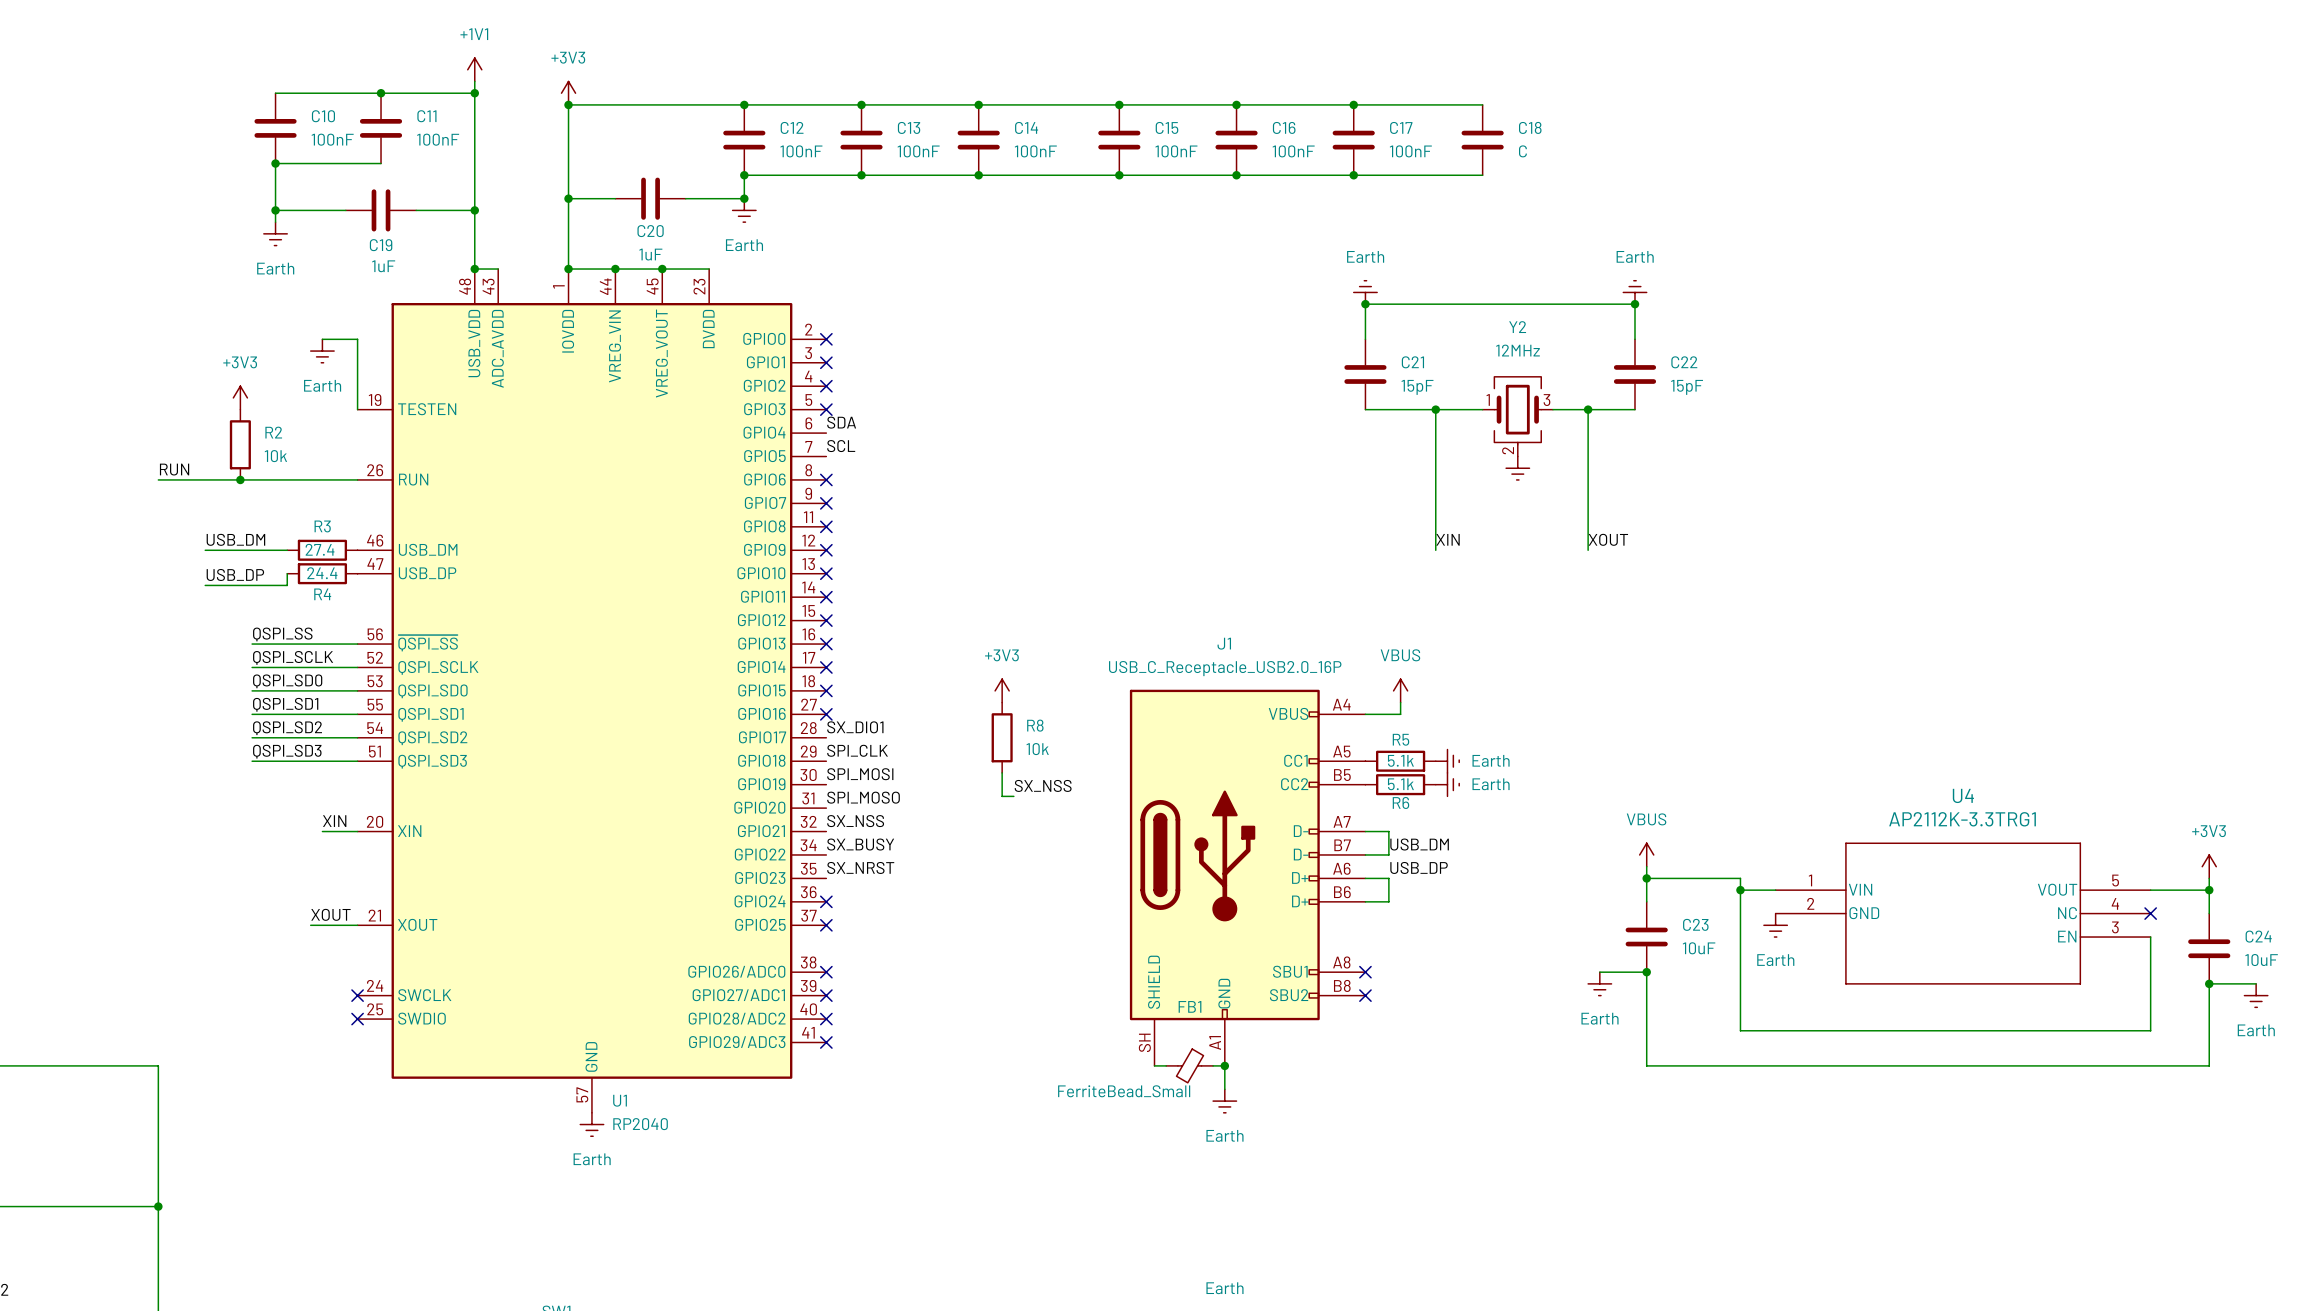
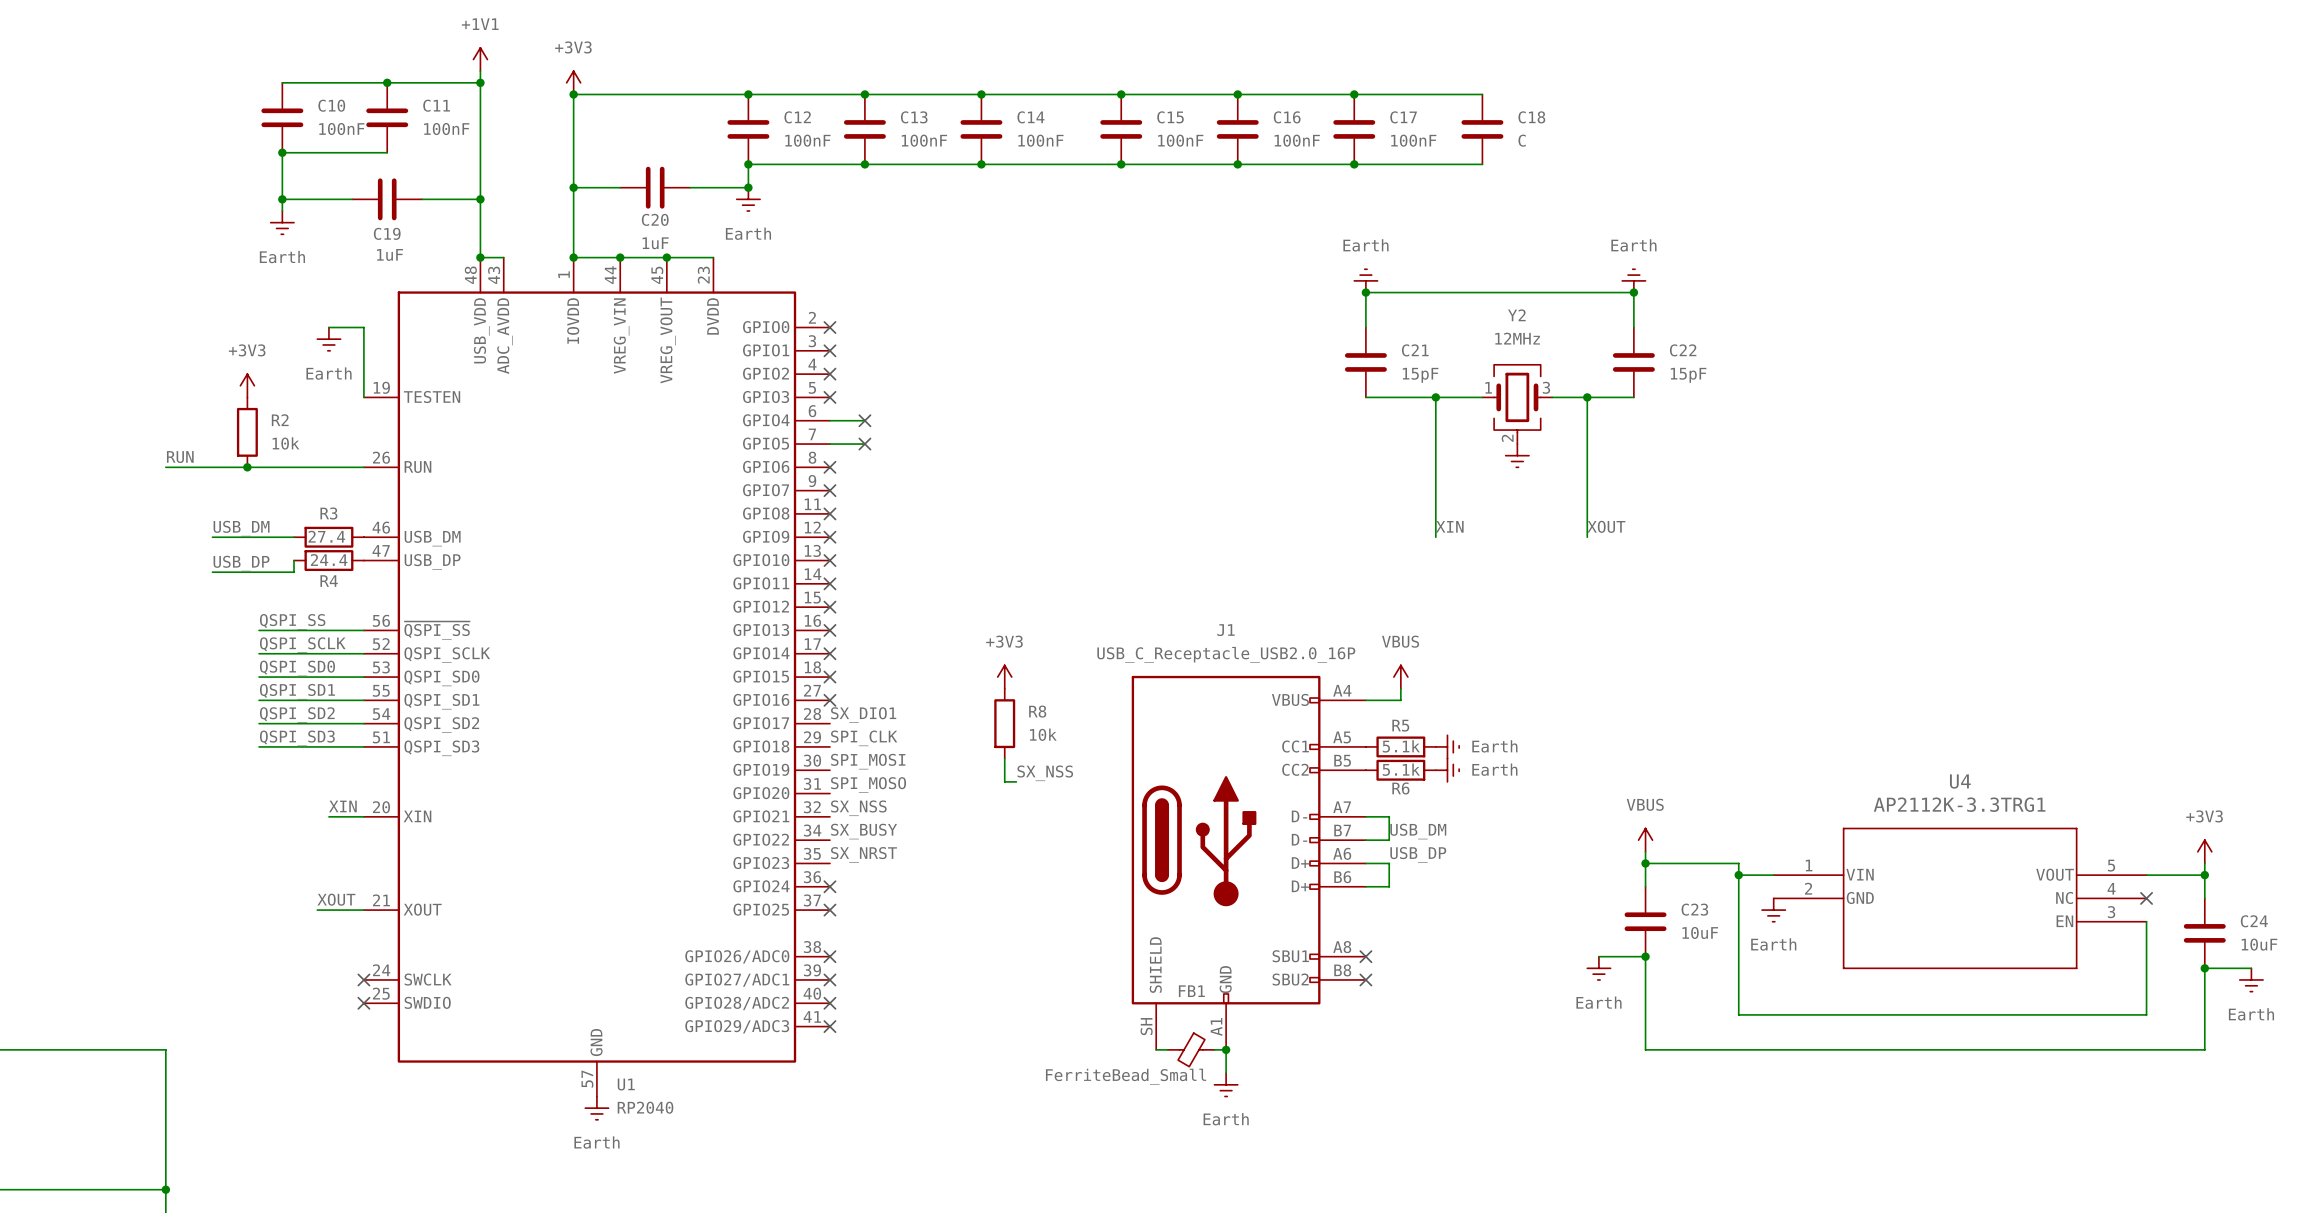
label: SDA (841, 422) -> none
wire: none -> (829, 420) (864, 420)
no-connect mark: none -> (864, 420)
label: SCL (841, 446) -> none
wire: none -> (829, 444) (864, 444)
no-connect mark: none -> (864, 444)

